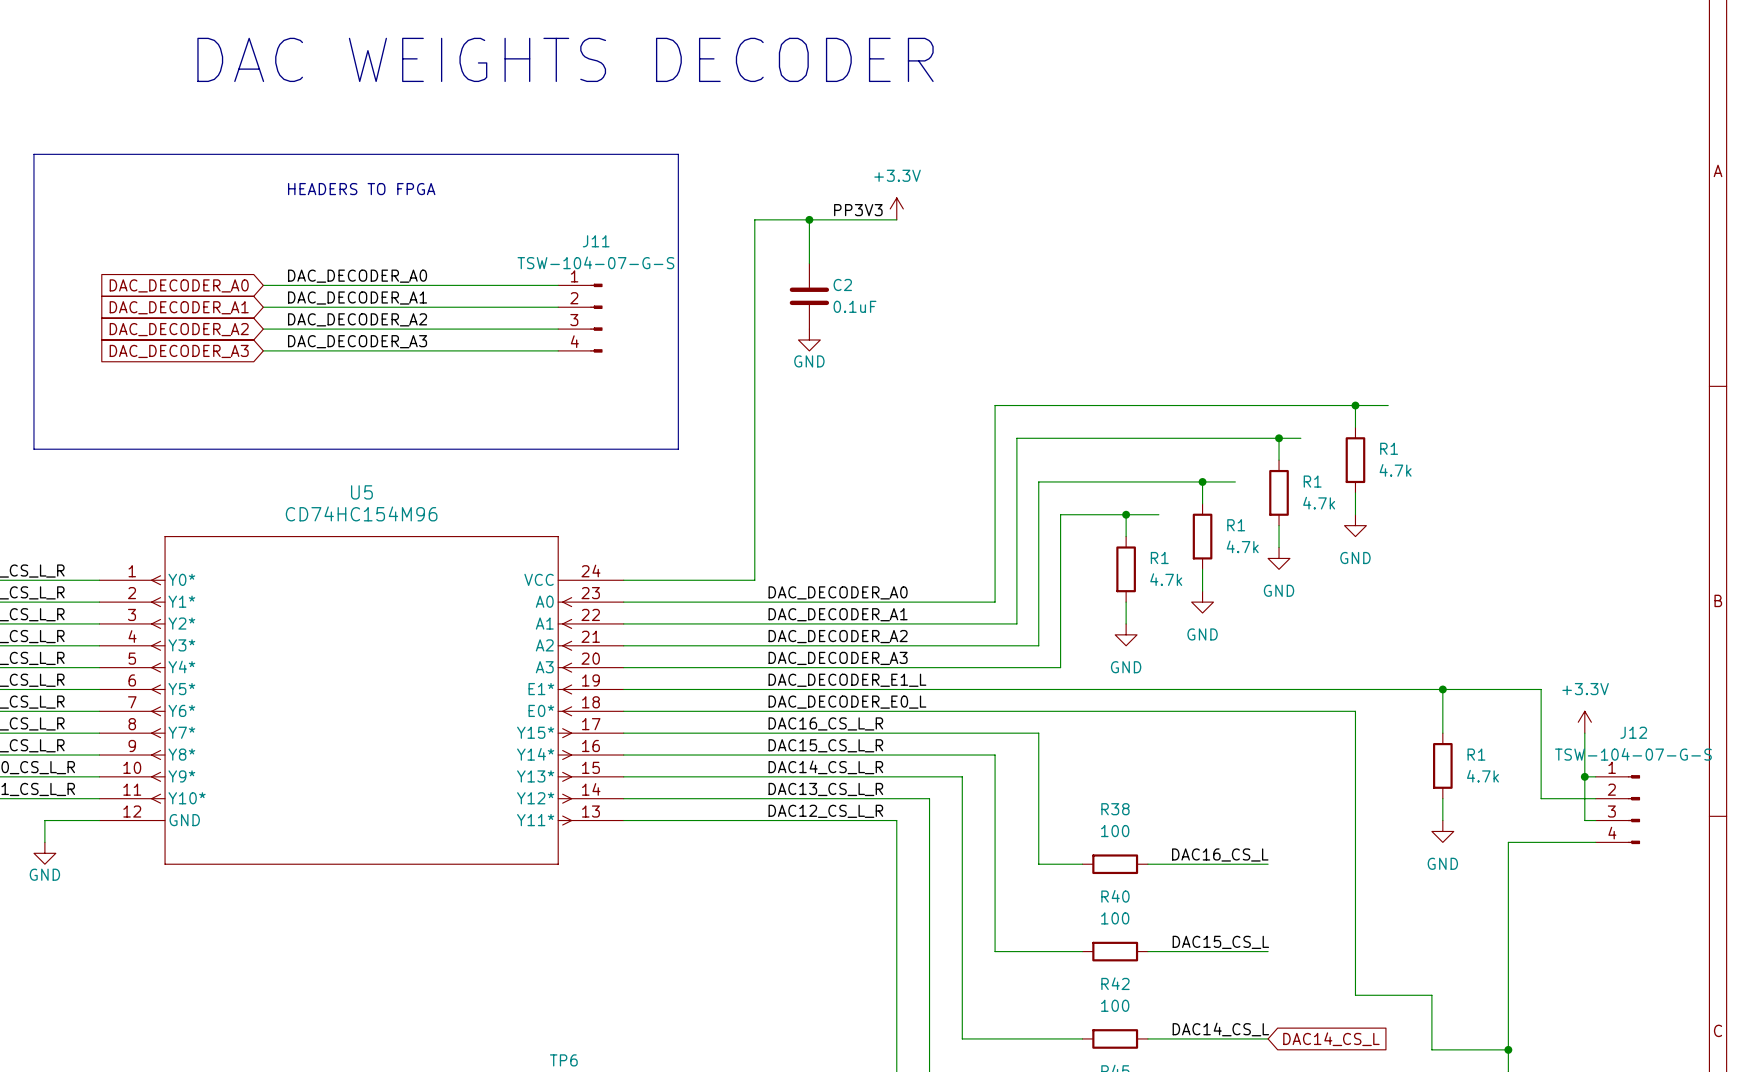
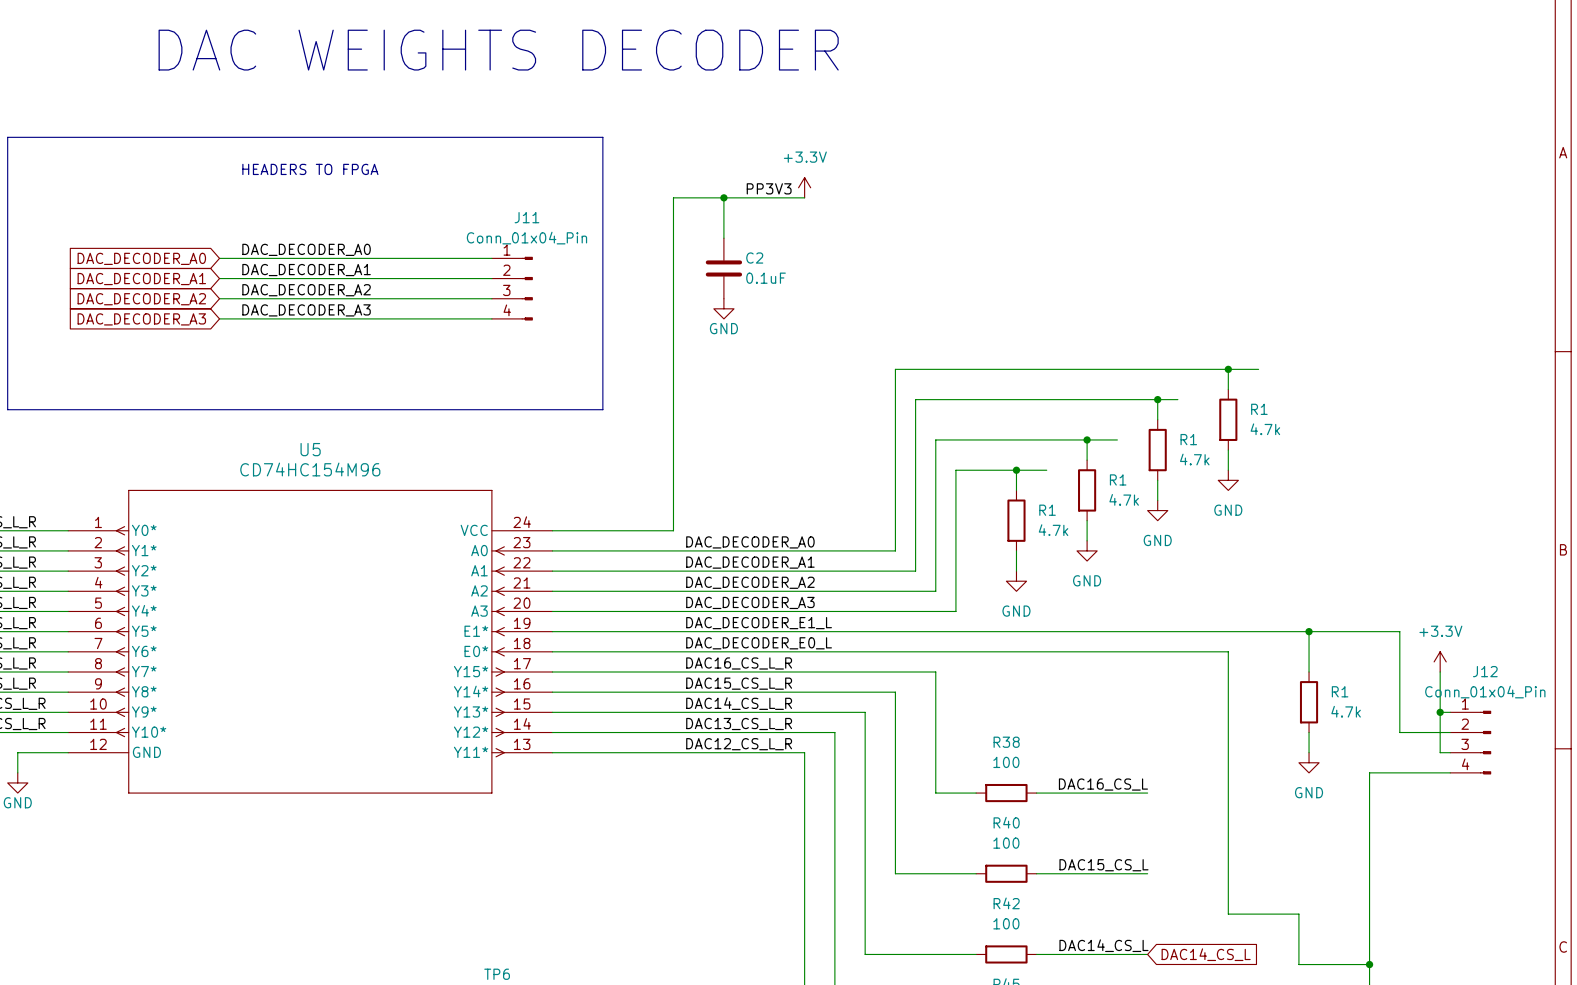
J11 value: TSW-104-07-G-S (595, 262) -> Conn_01x04_Pin (526, 238)
J12 value: TSW-104-07-G-S (1633, 754) -> Conn_01x04_Pin (1485, 692)

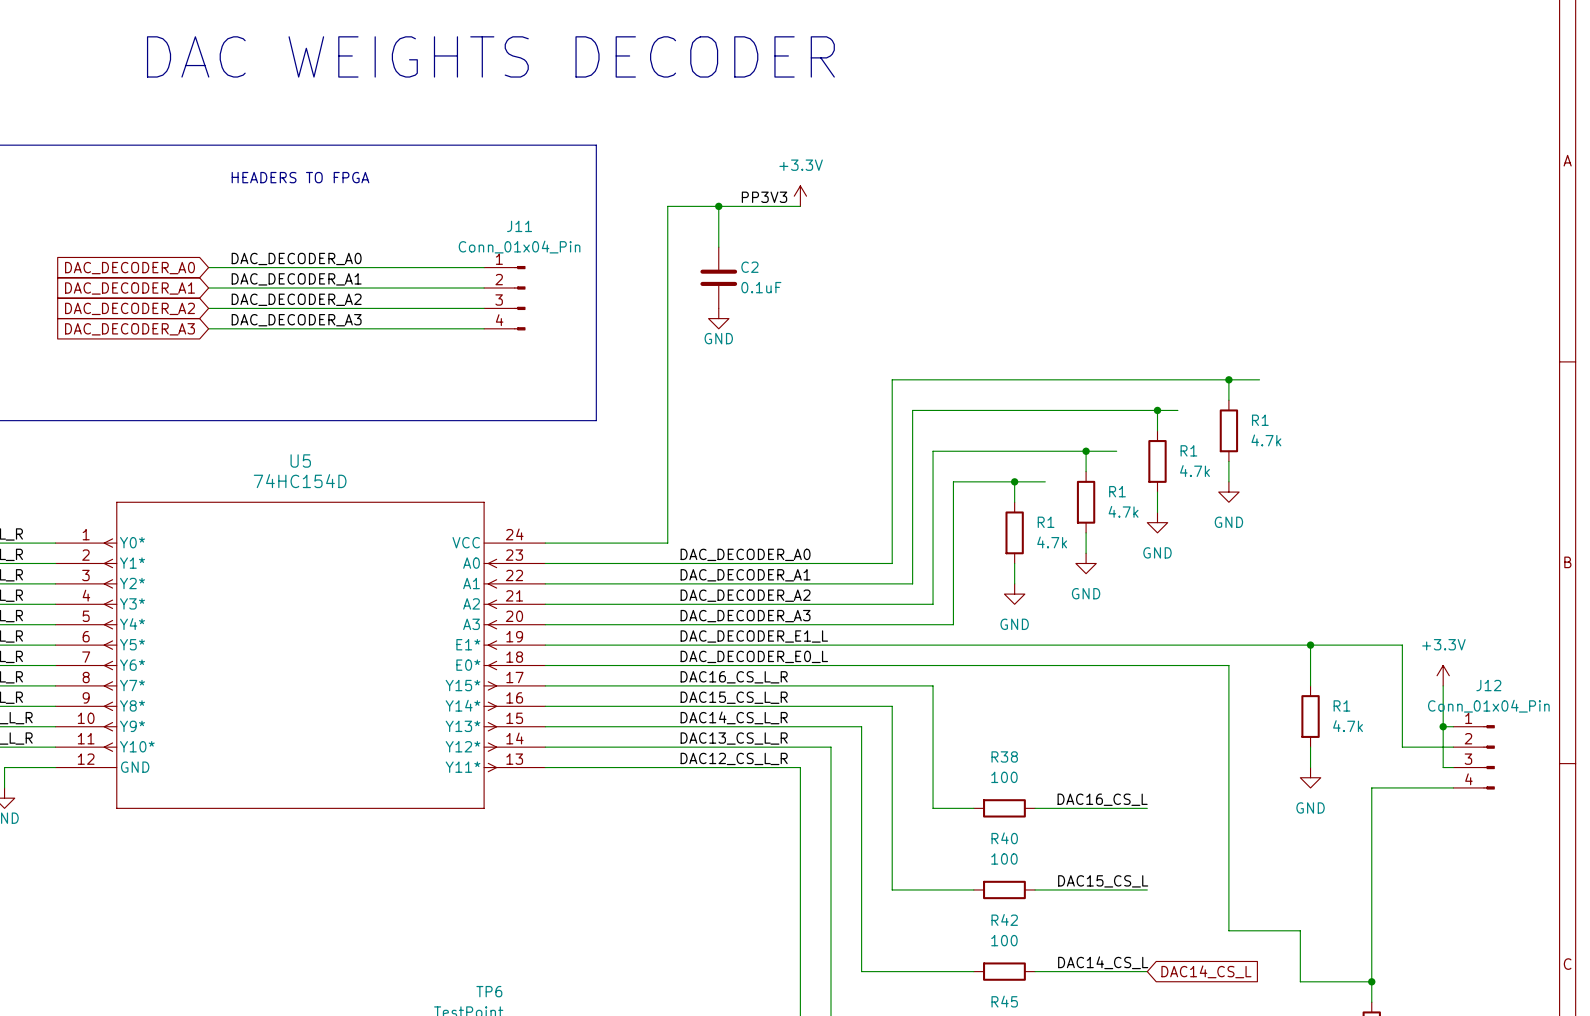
U5 value: CD74HC154M96 (310, 469) -> 74HC154D (300, 481)

